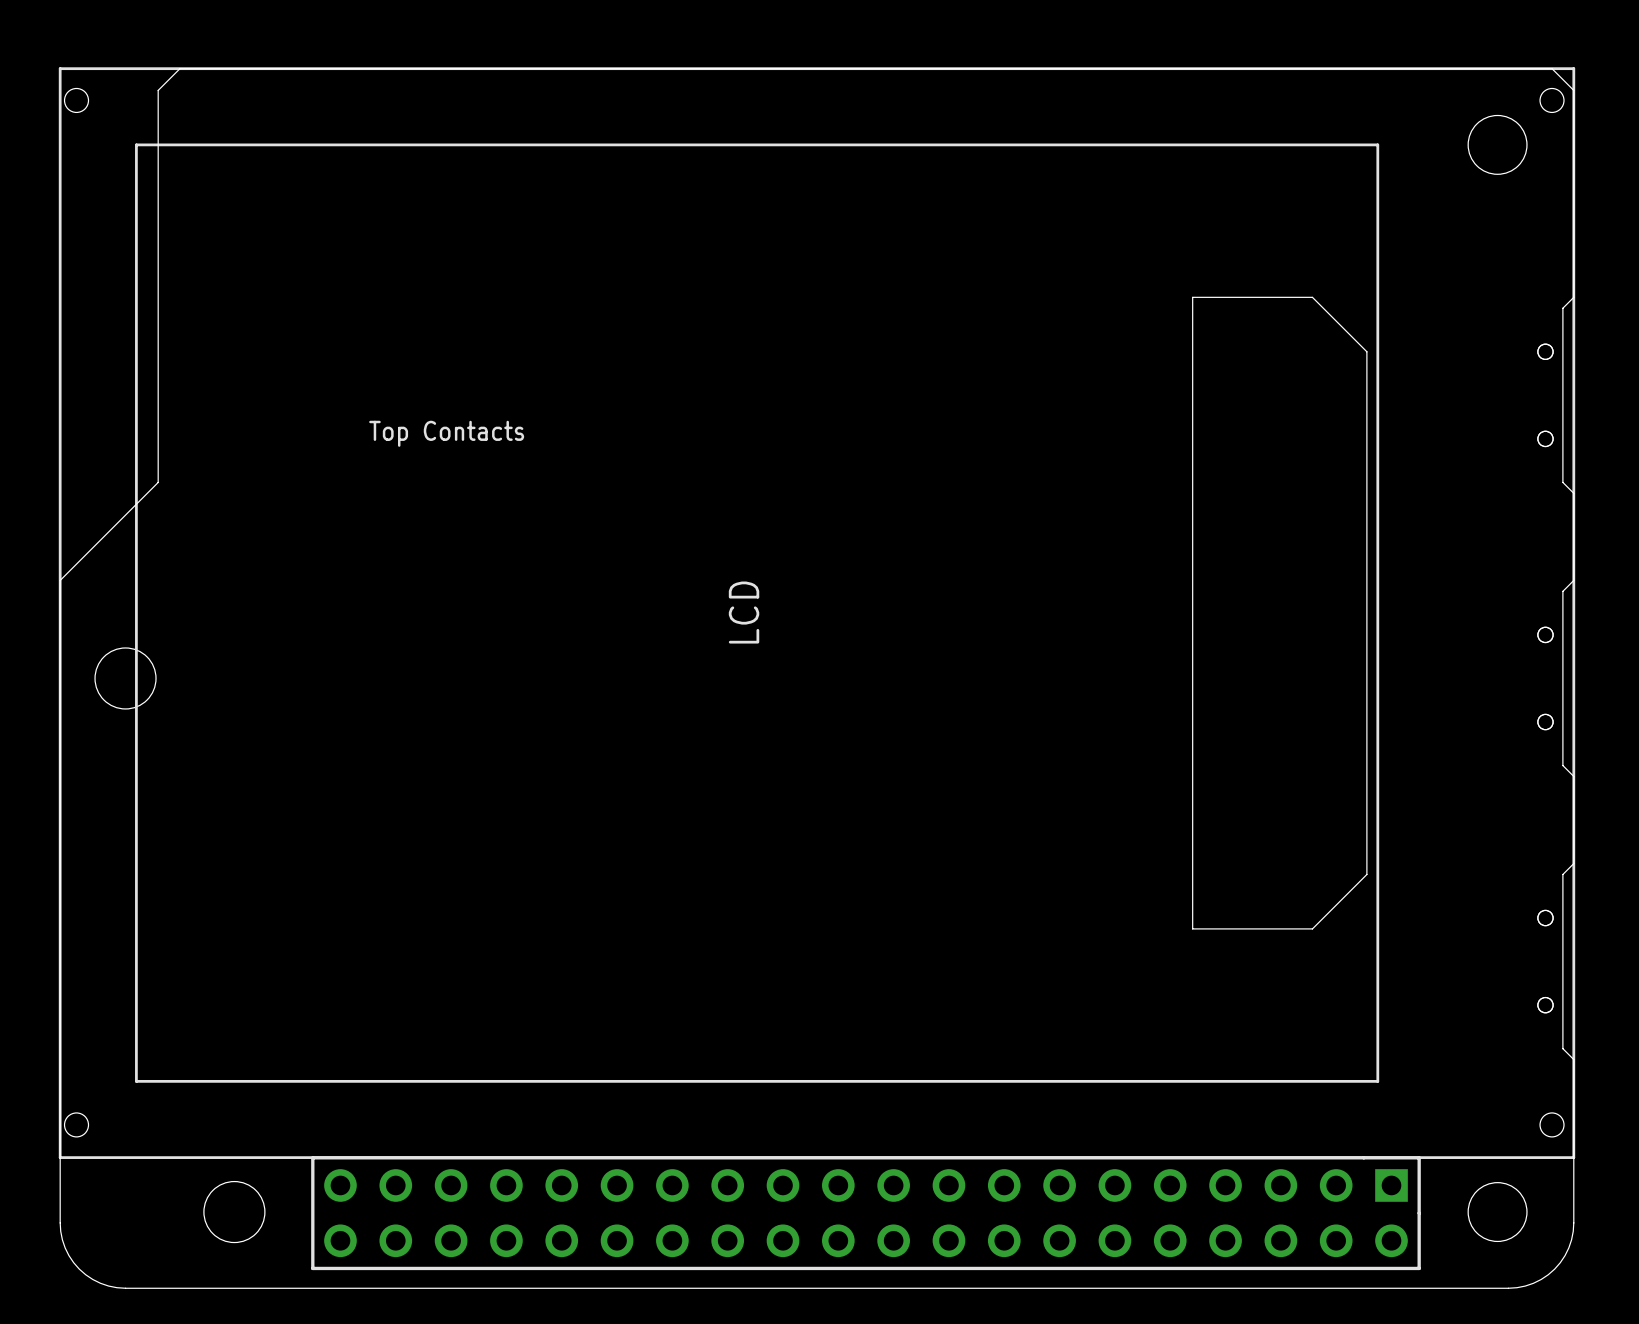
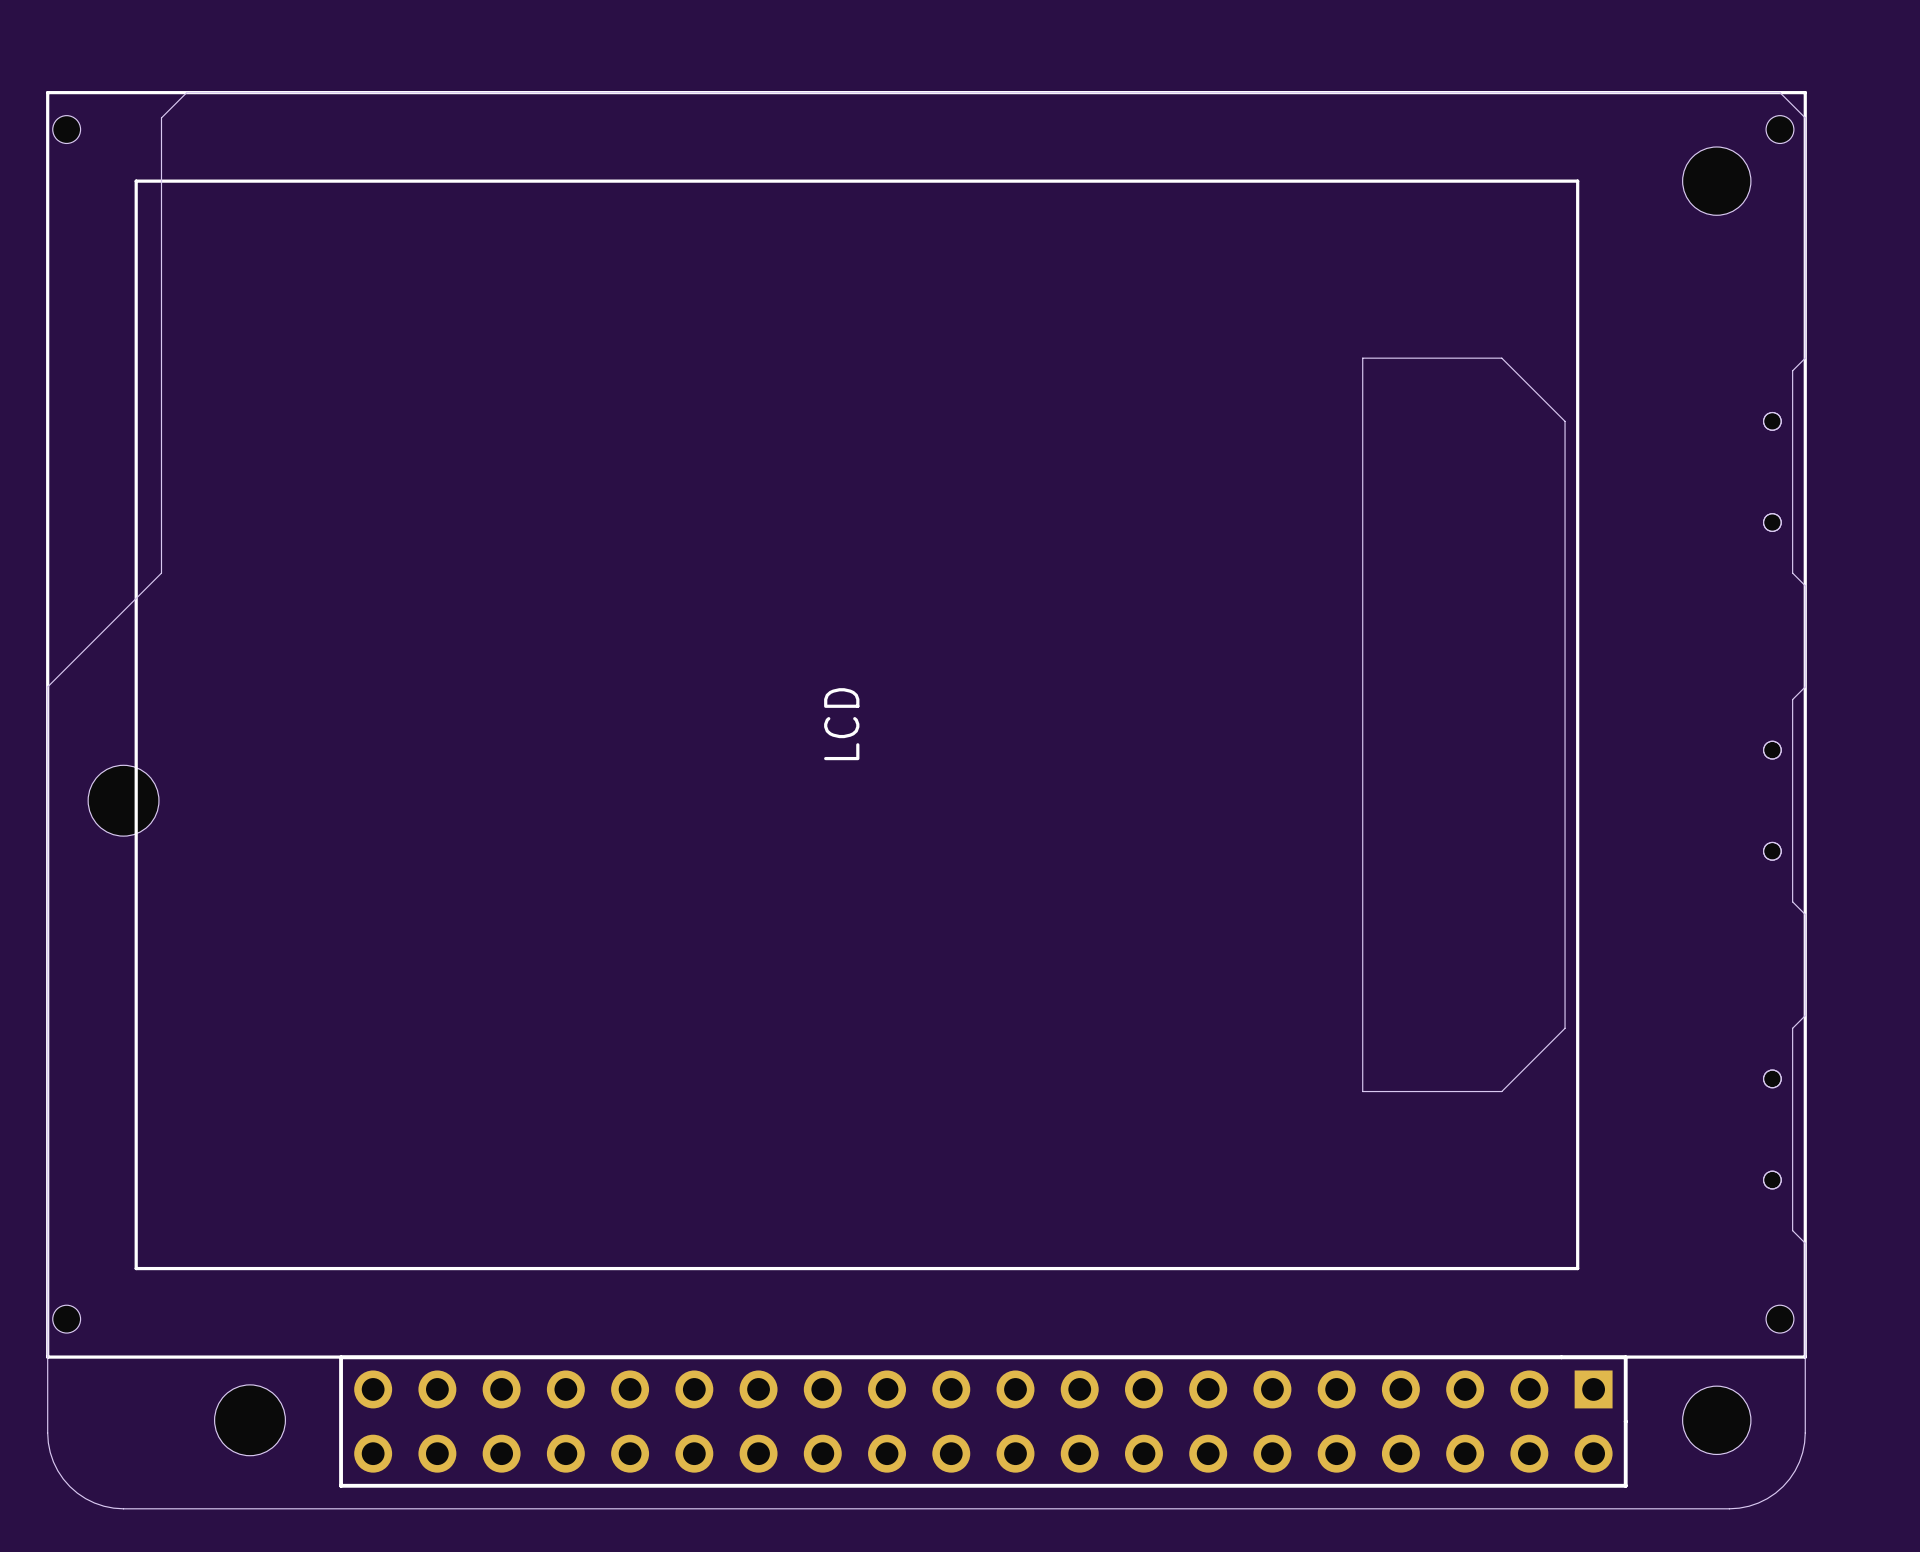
text: Top Contacts (446, 433) -> none

